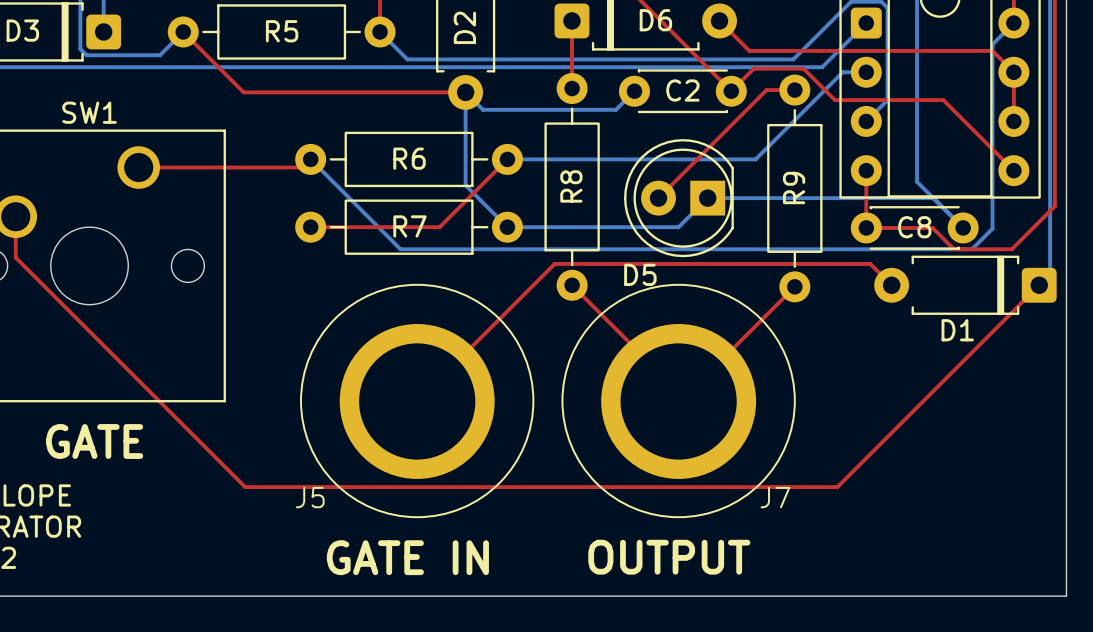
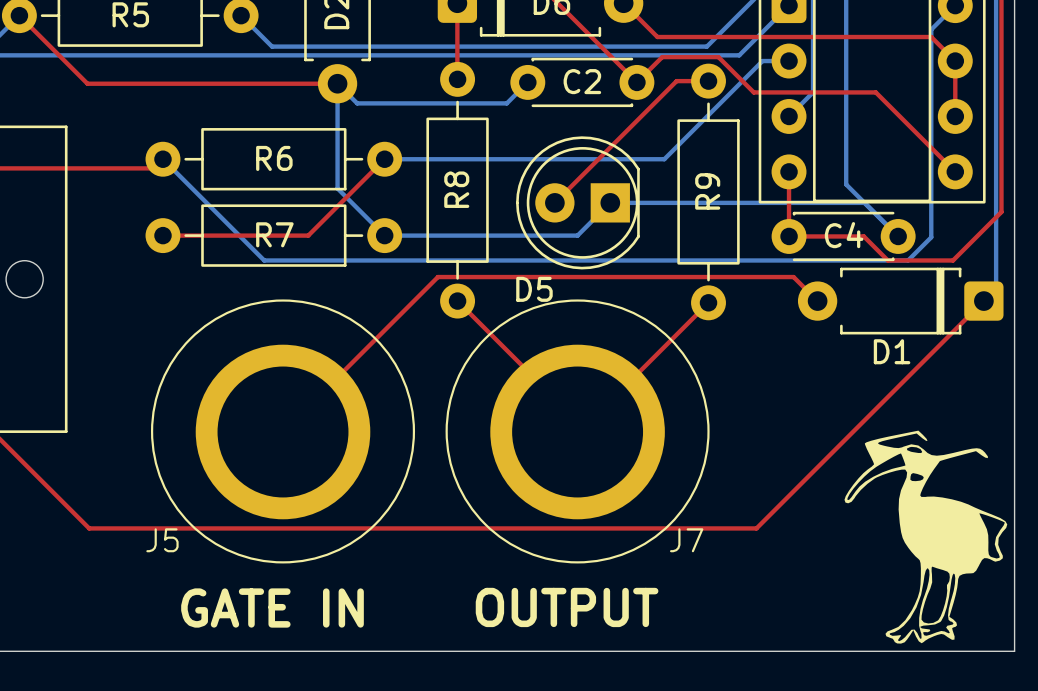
C8 name: C8 (914, 227) -> C4 (844, 235)
drawing: none -> [844, 430, 1008, 644]

